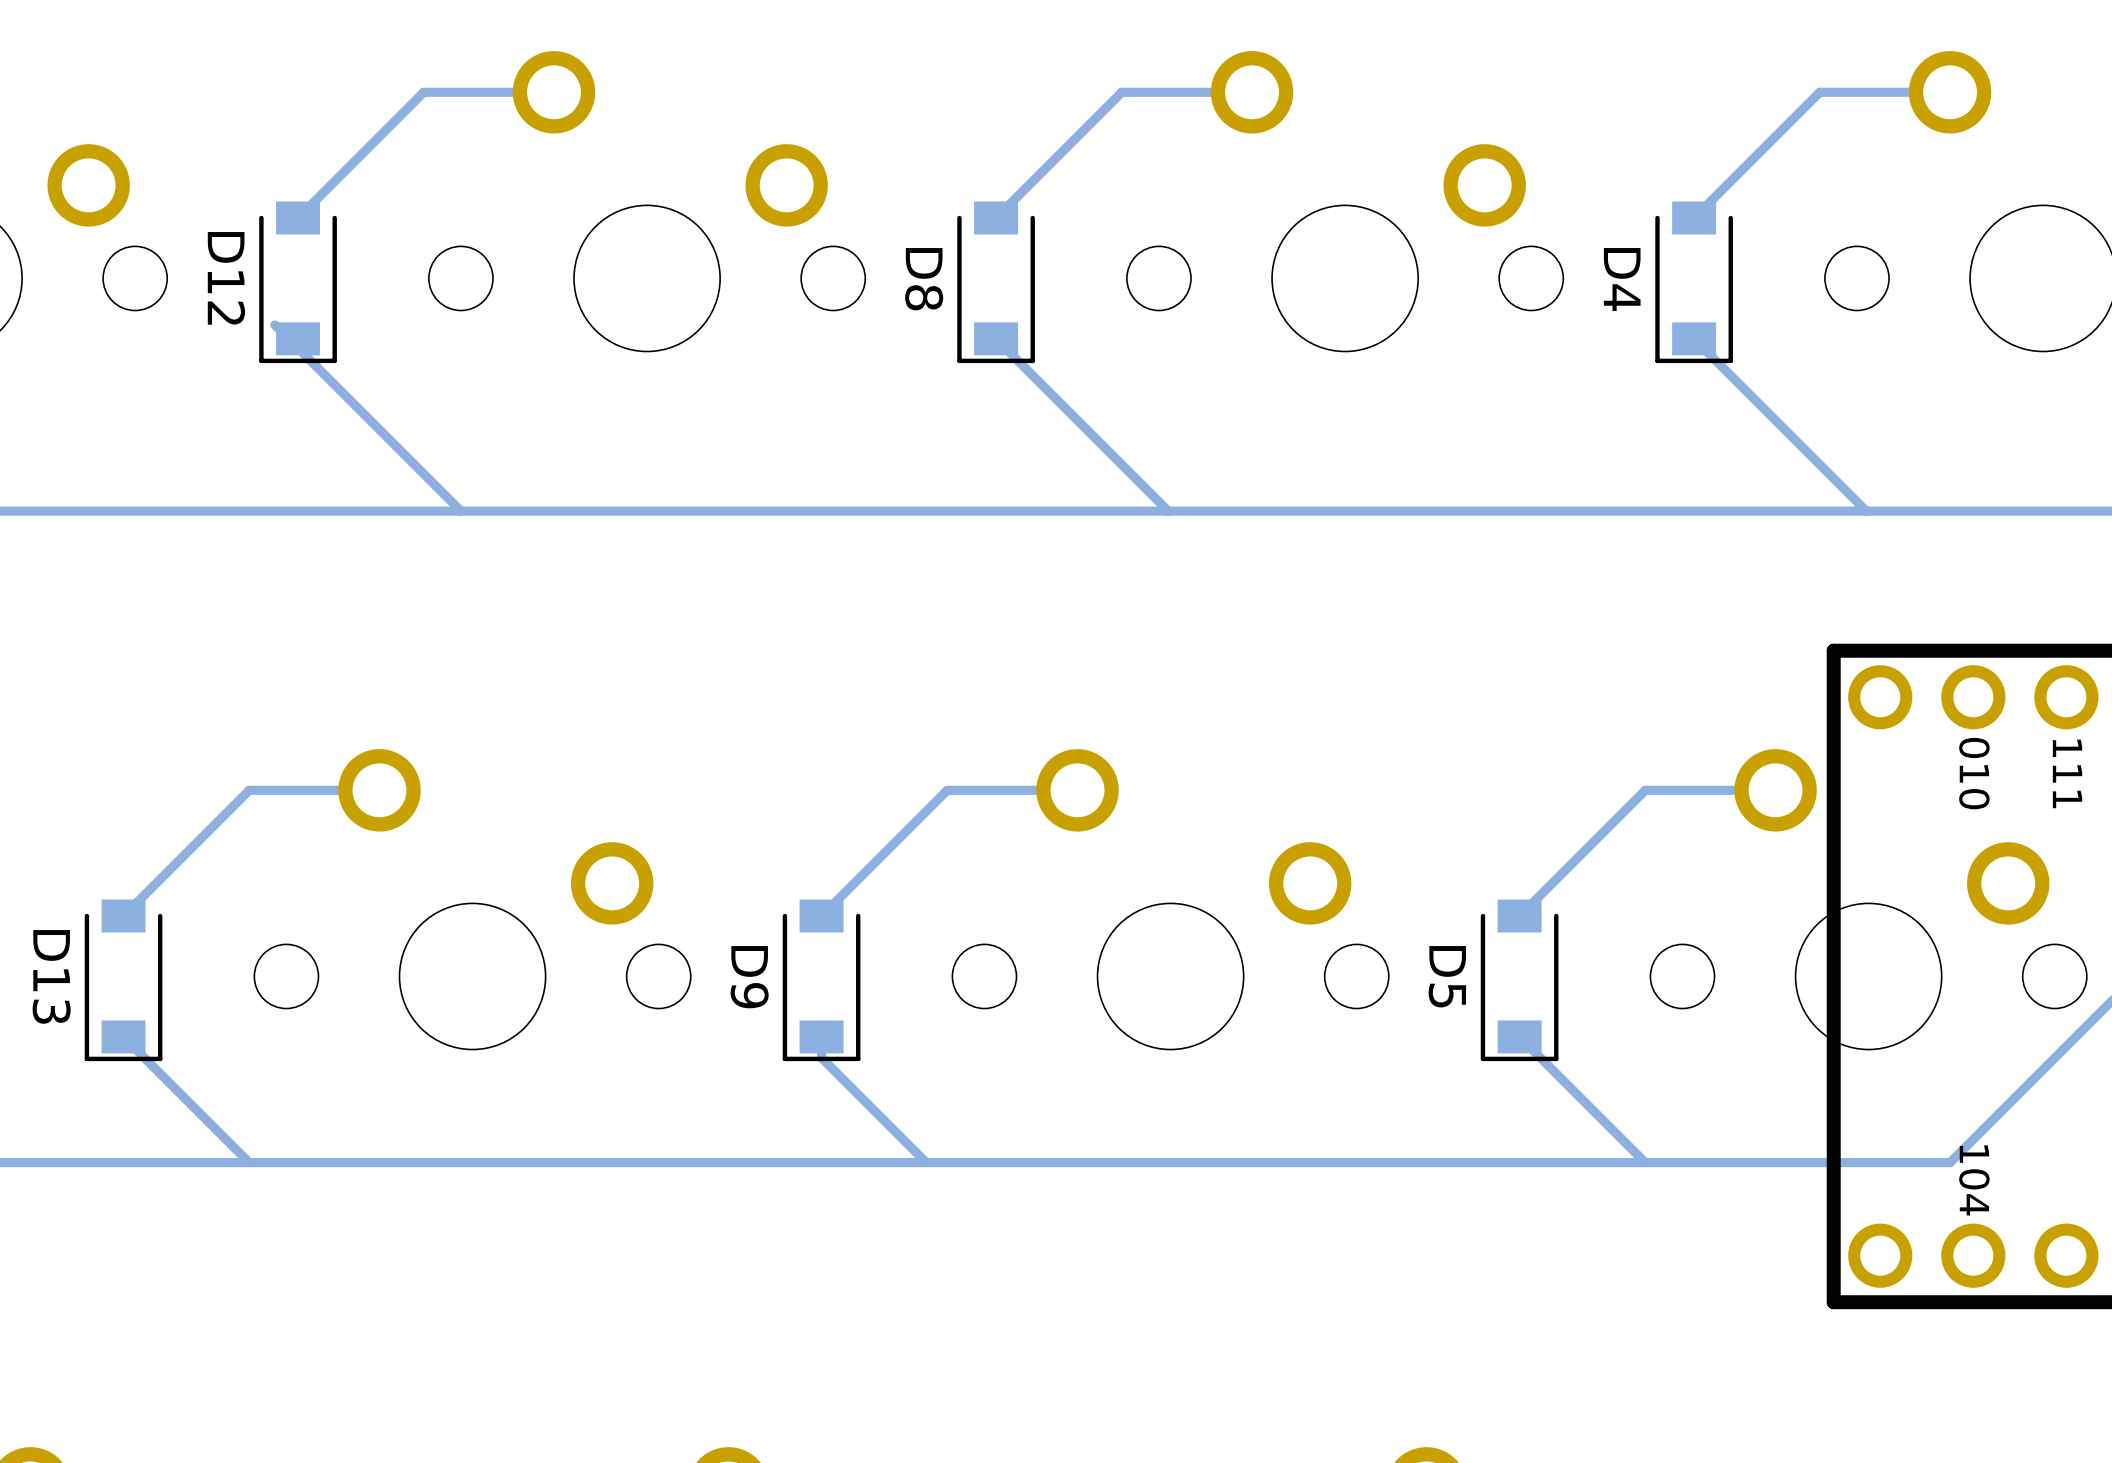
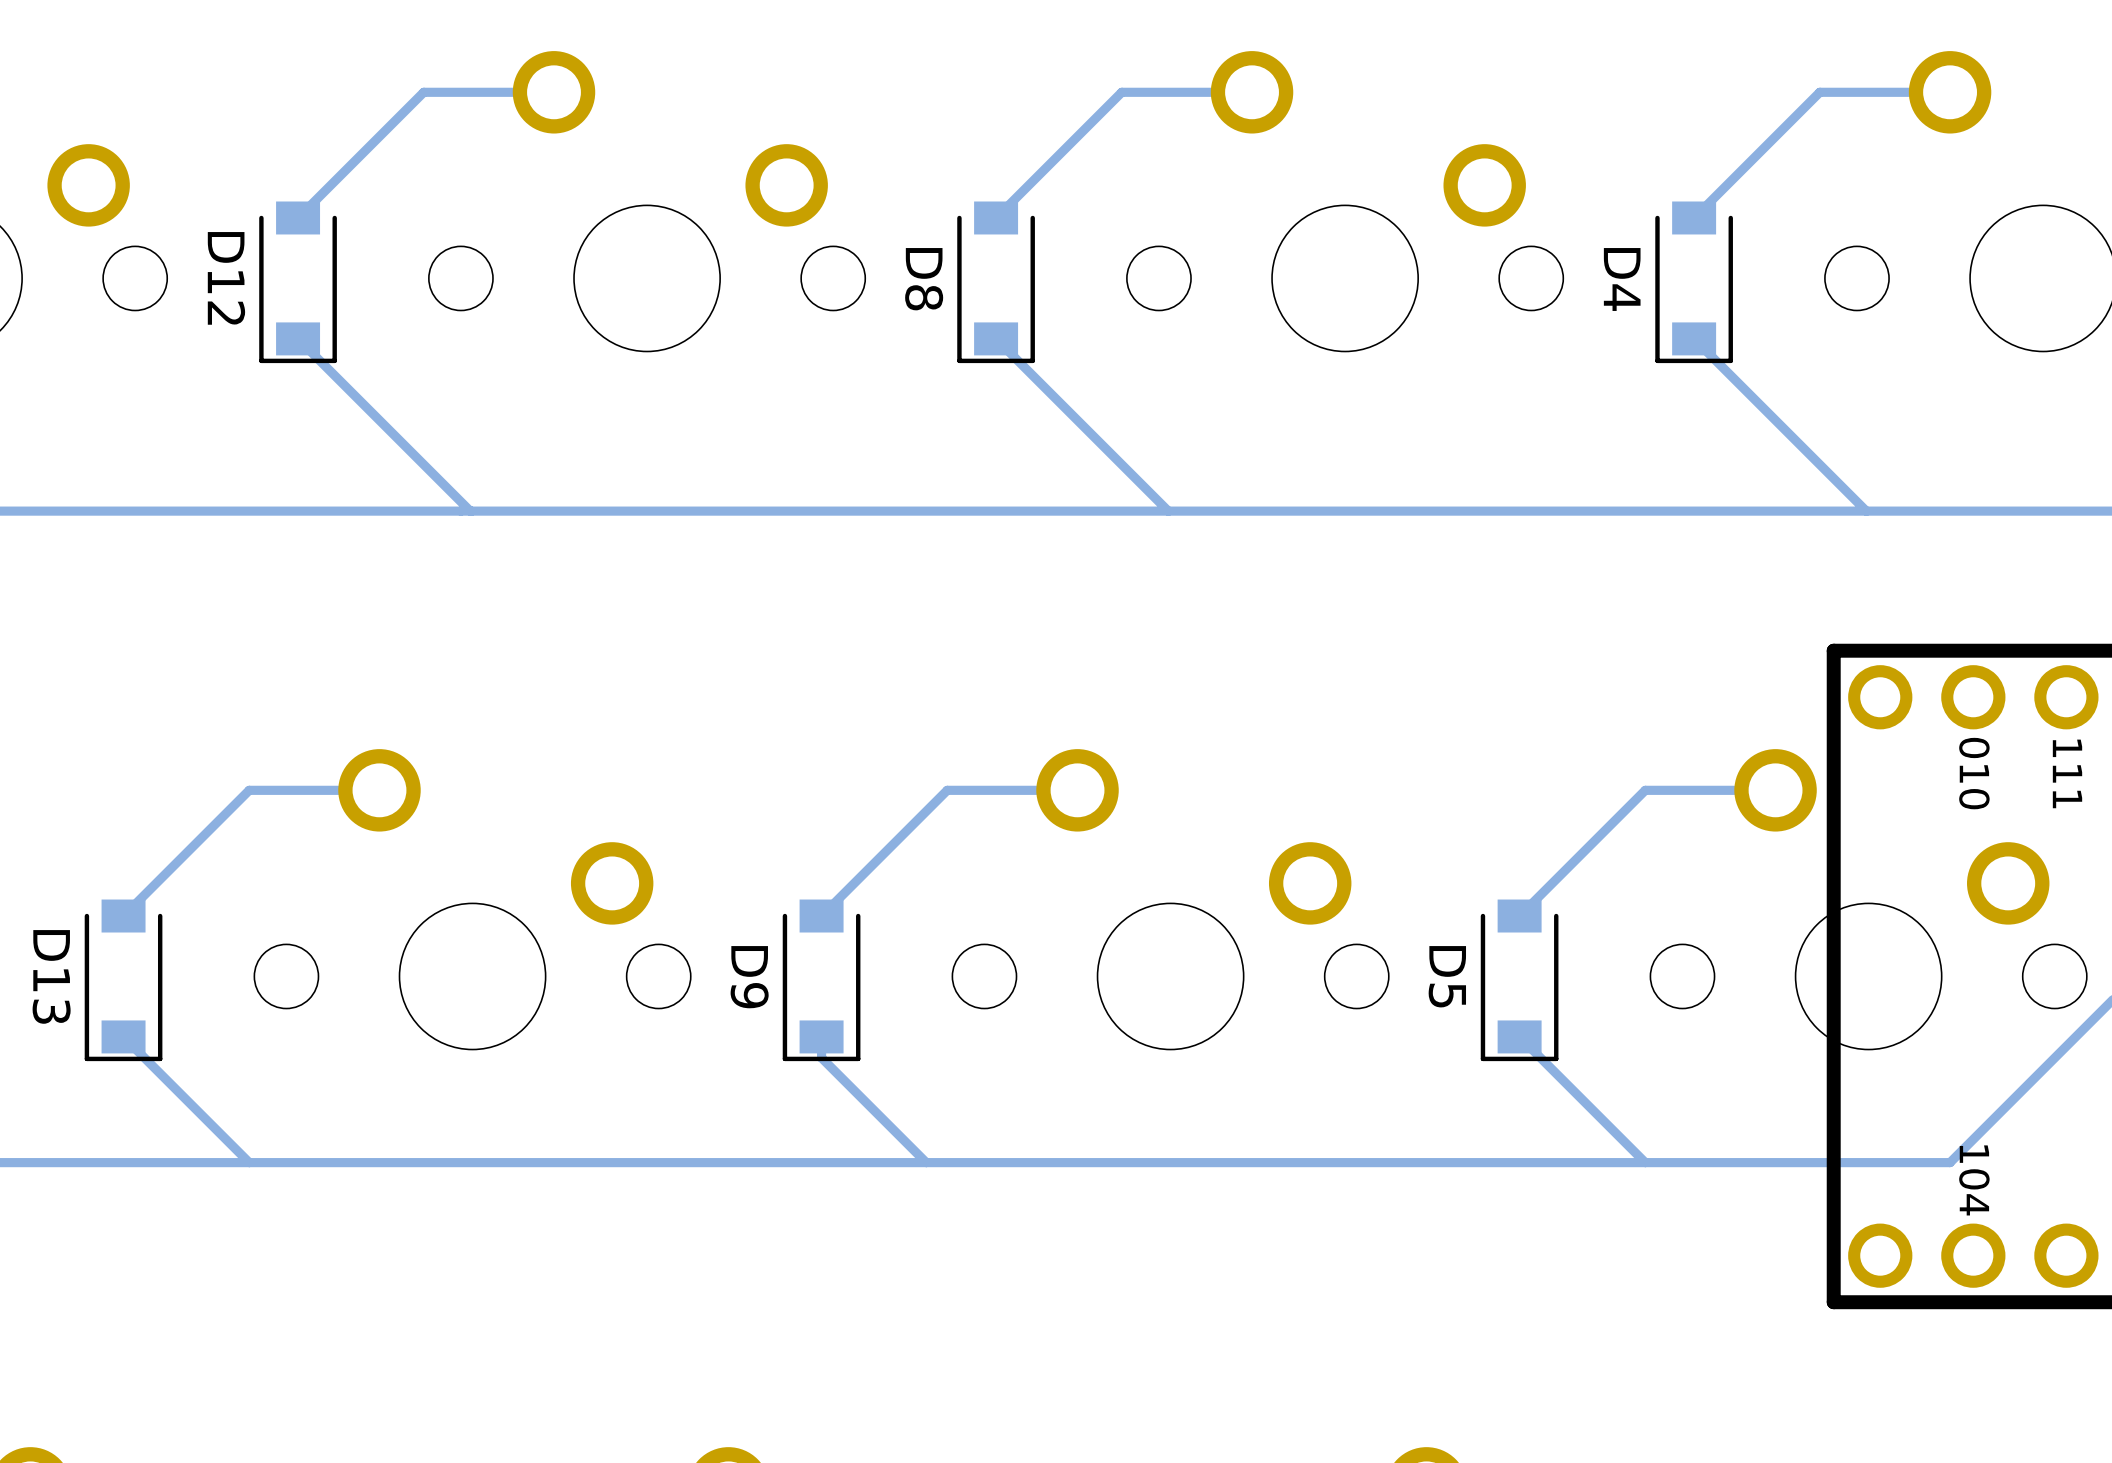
track: (274, 324) (460, 511) -> none
track: none -> (298, 338) (470, 511)

